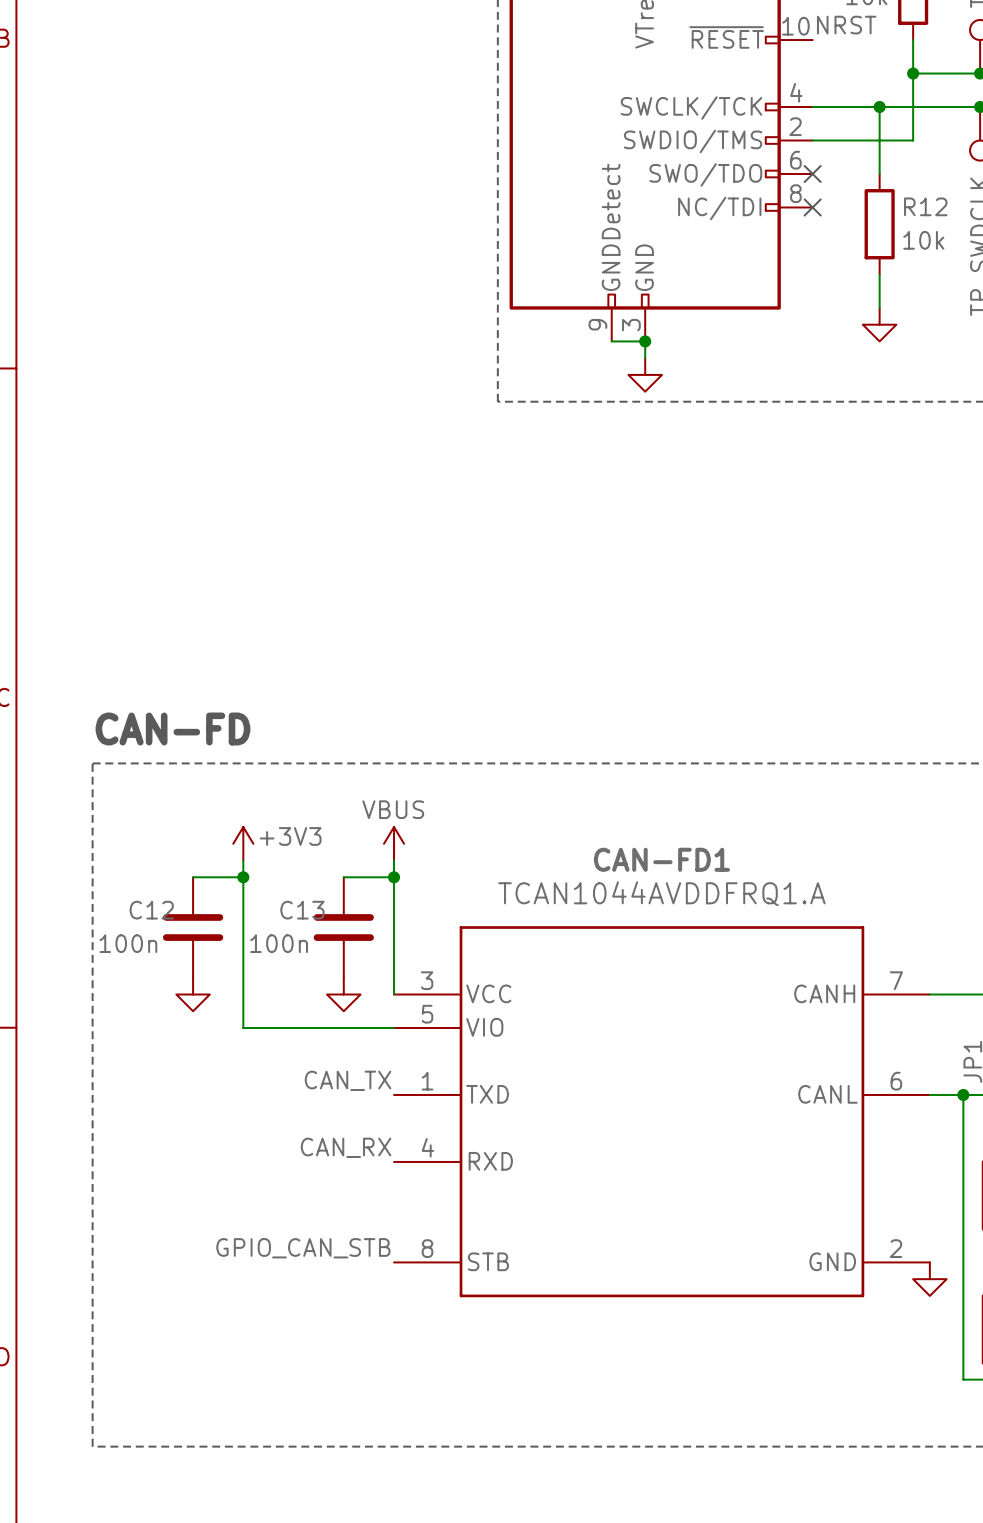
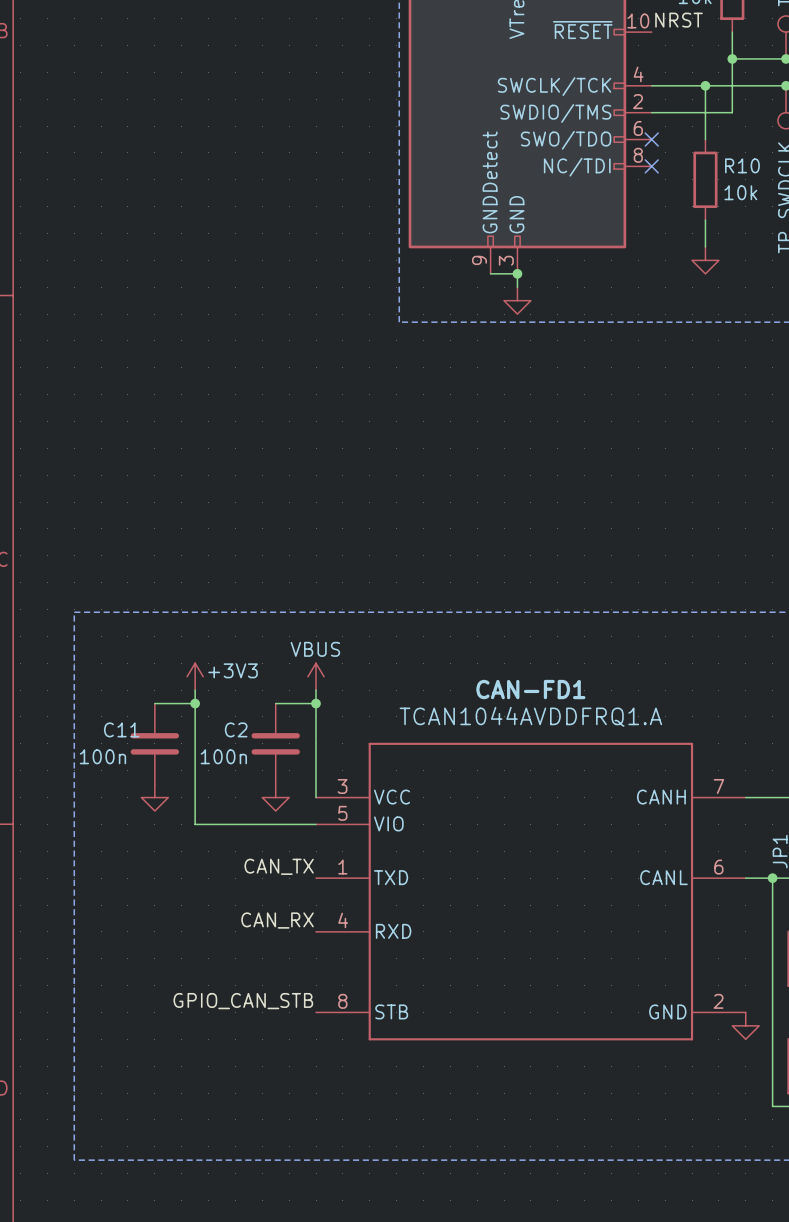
R12 name: R12 (925, 206) -> R10 (742, 165)
text: CAN-FD (172, 729) -> none
C12 name: C12 (151, 910) -> C11 (121, 729)
C13 name: C13 (302, 910) -> C2 (236, 729)

